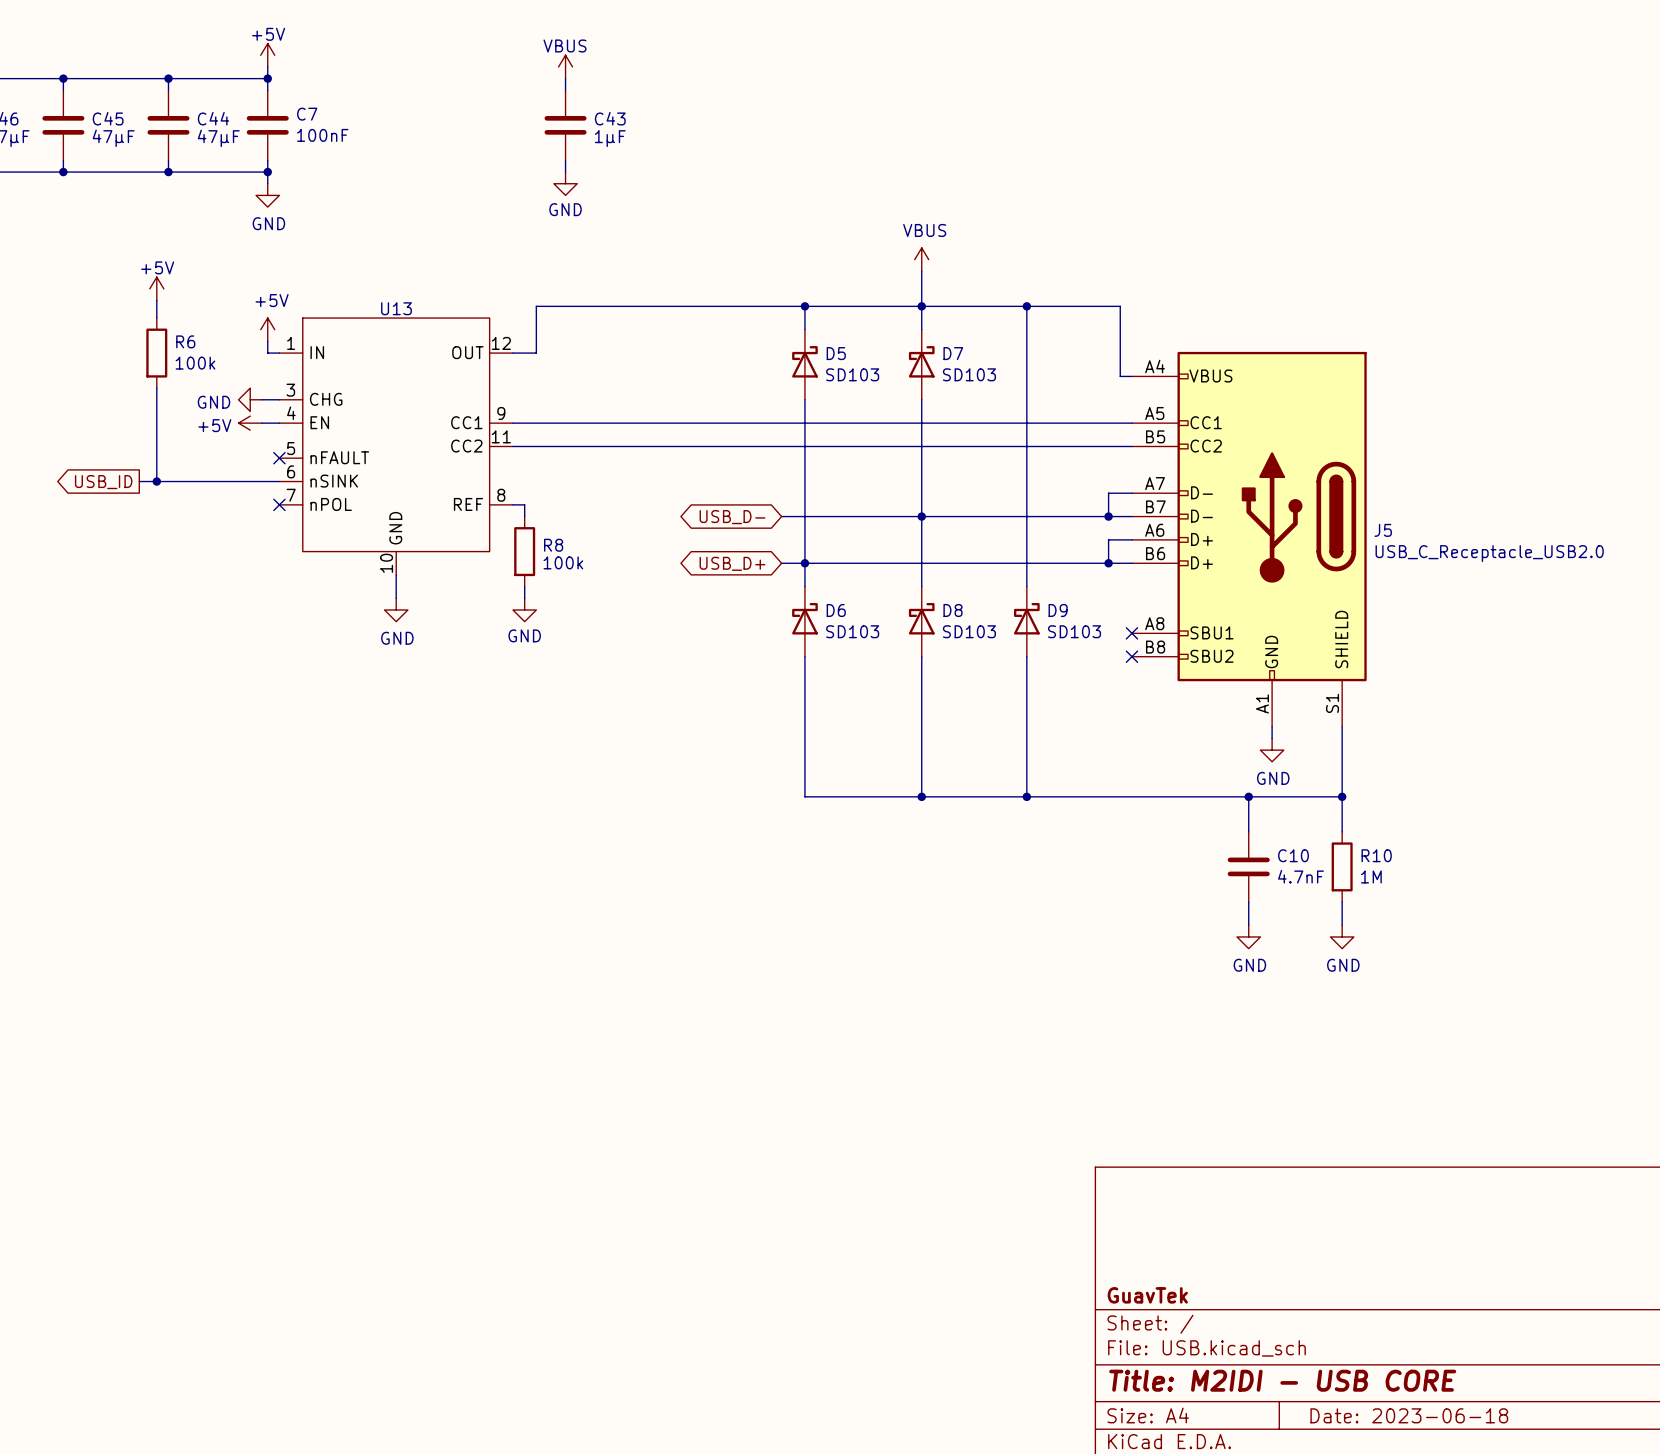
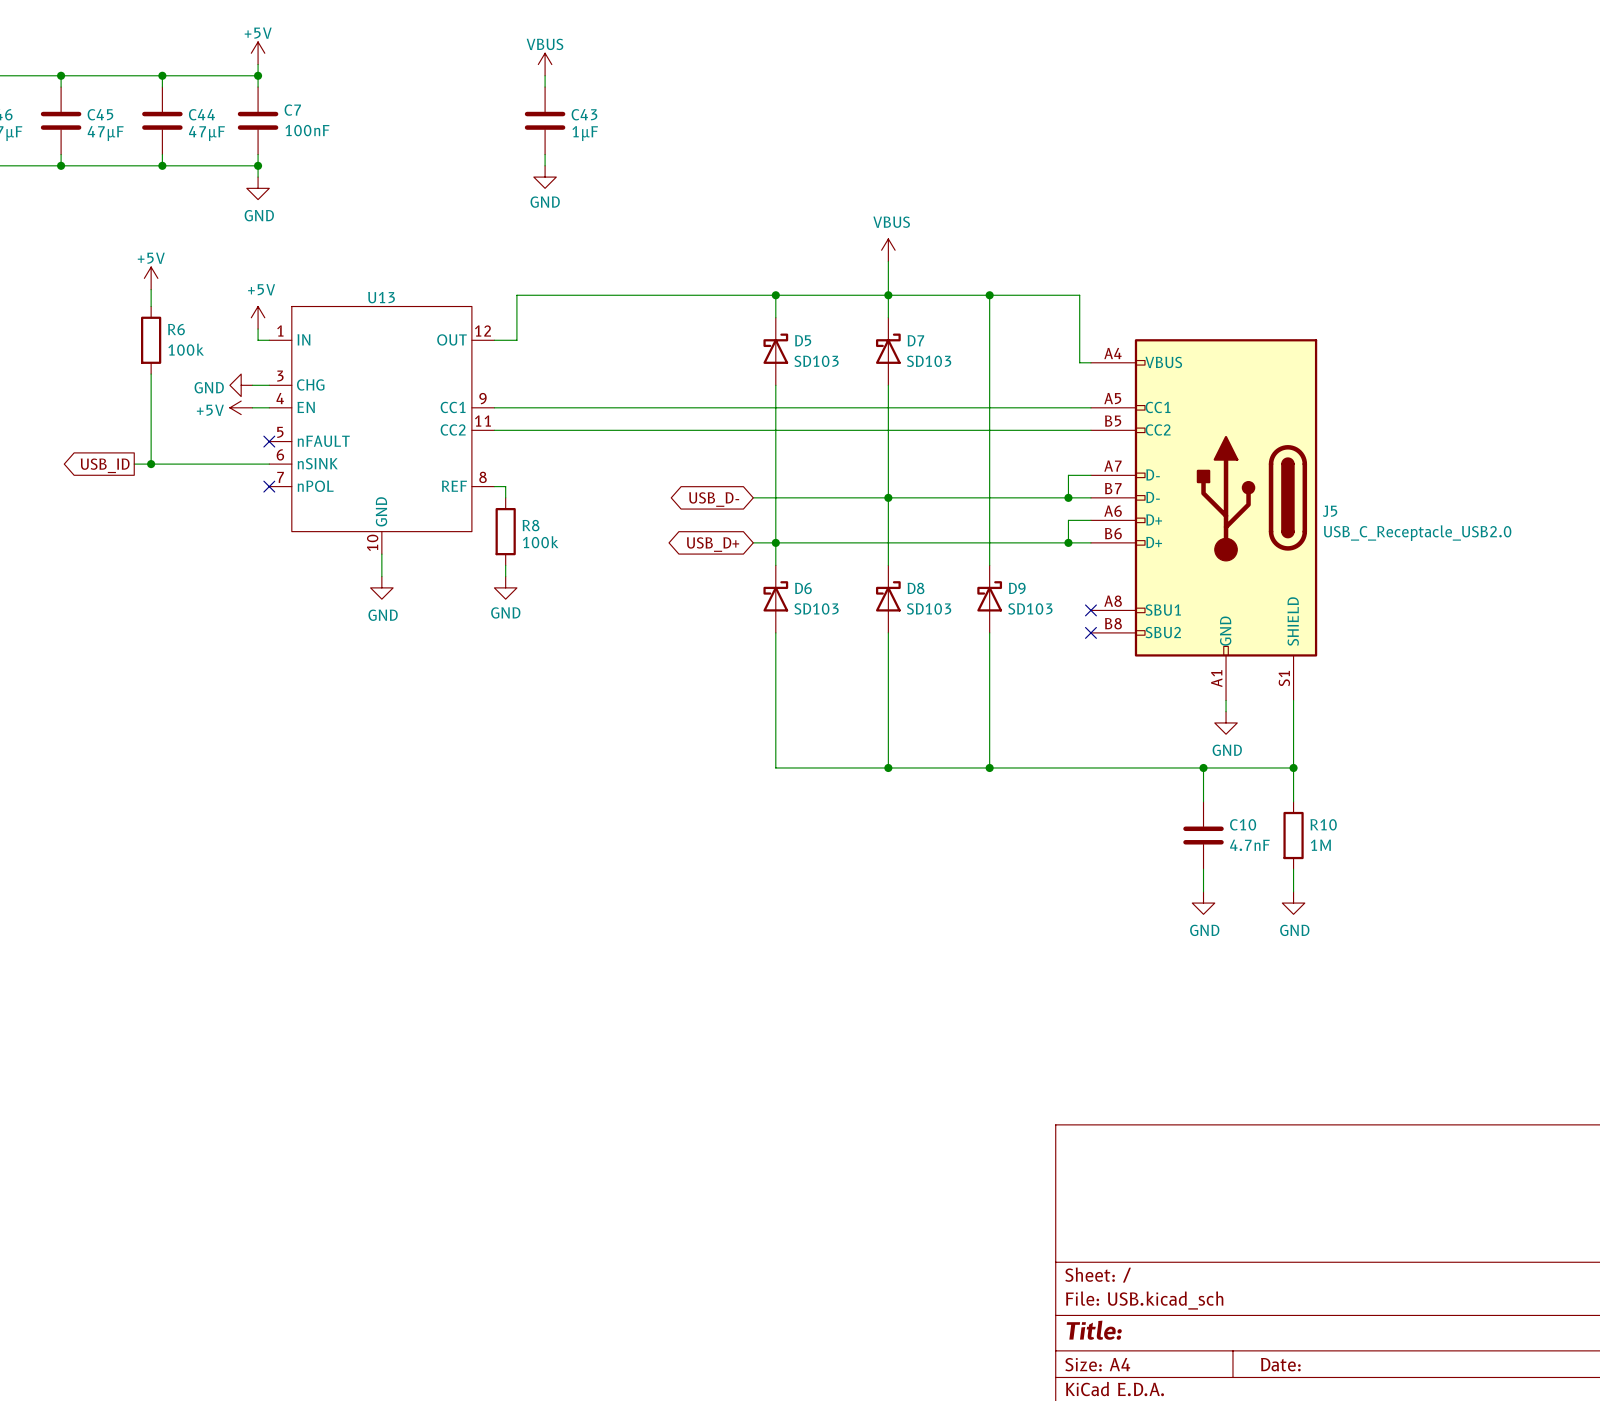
title block: GuavTek (1147, 1295) -> none
title block: Title: M2IDI - USB CORE (1282, 1380) -> Title: (1094, 1330)
title block: Date: 2023-06-18 (1409, 1415) -> Date: (1280, 1364)

